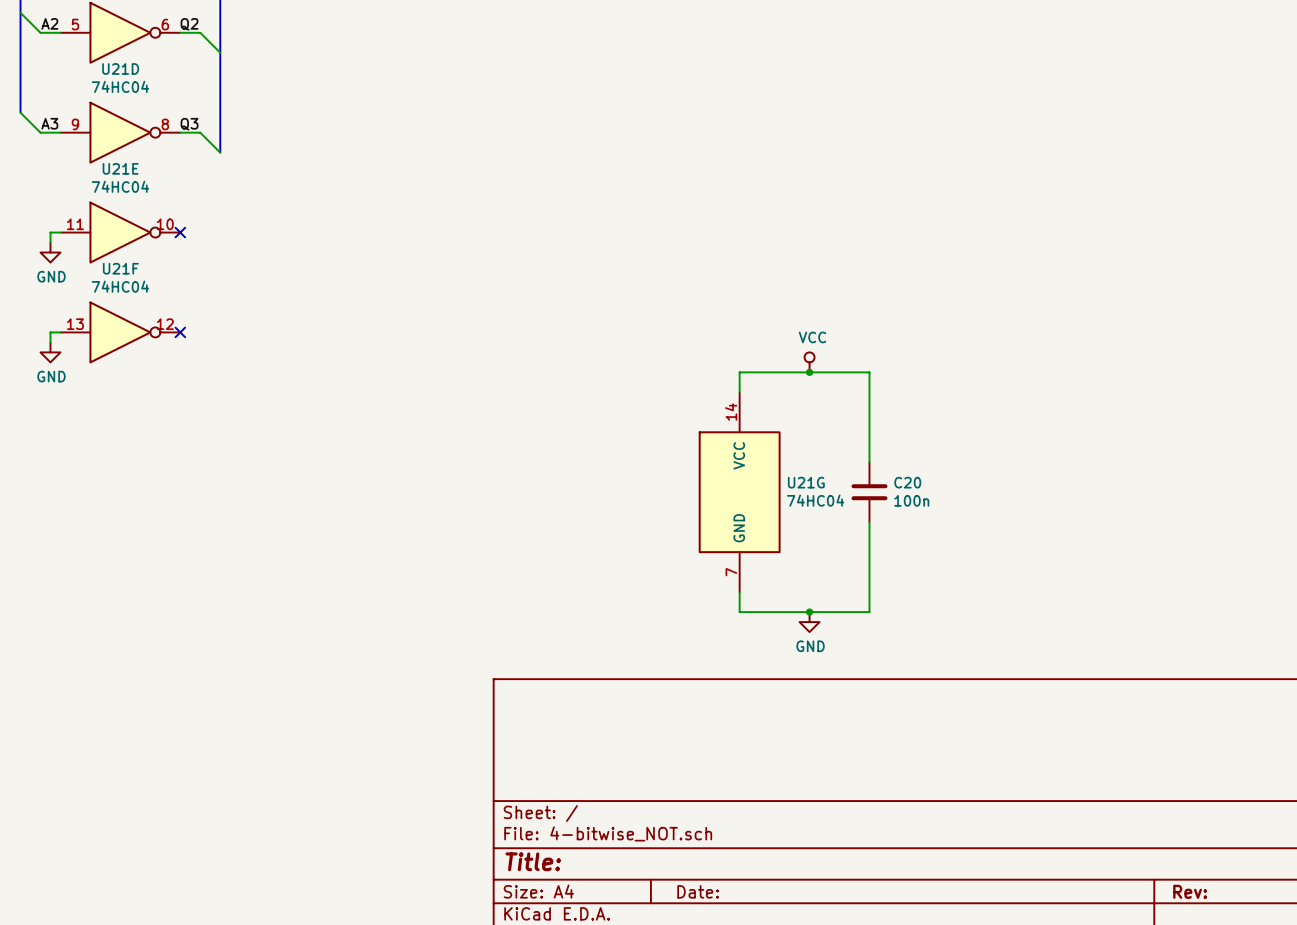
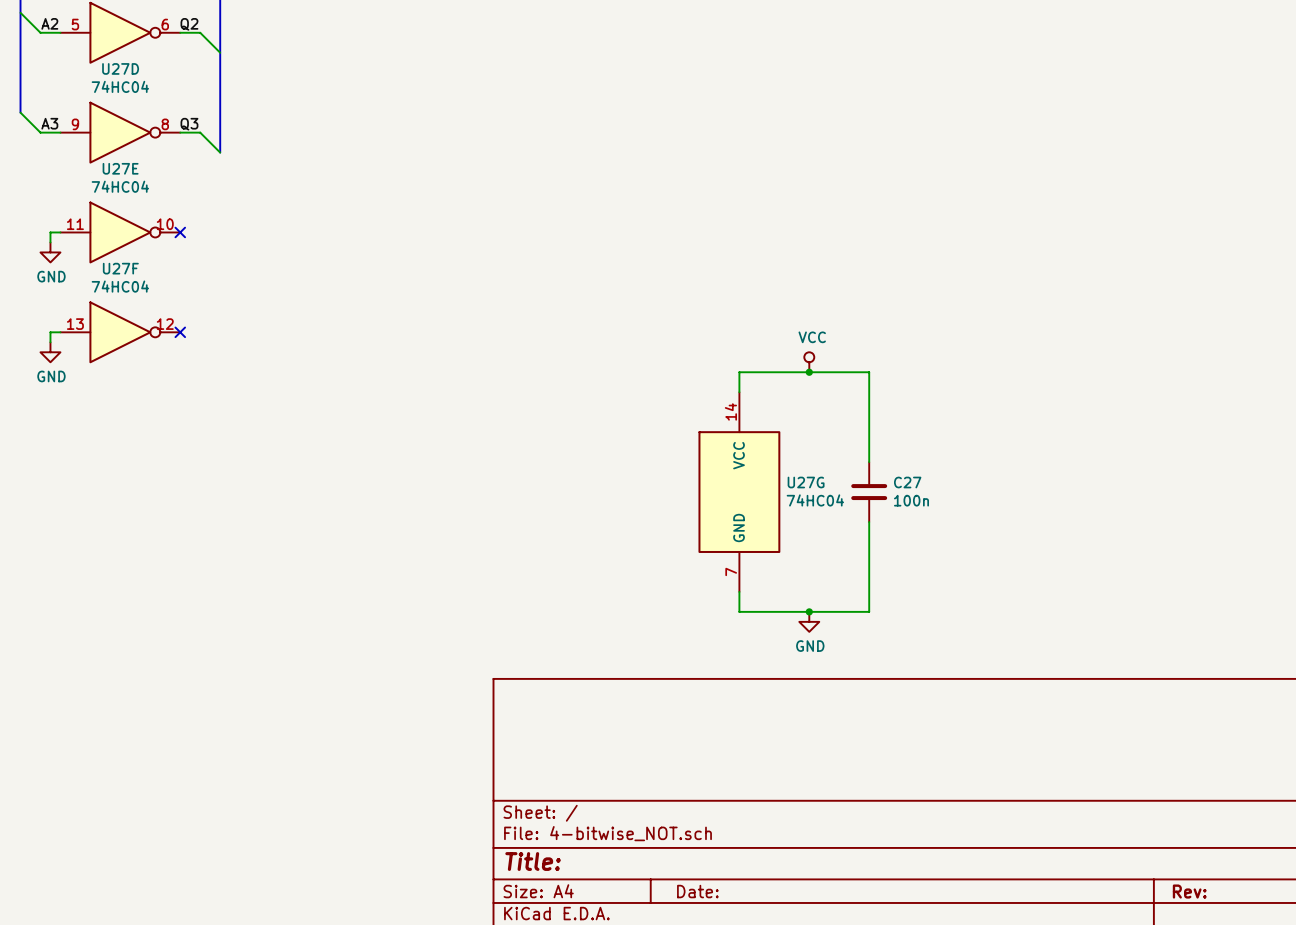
U21D name: U21D (120, 68) -> U27D (120, 68)
U21E name: U21E (120, 168) -> U27E (120, 168)
U21F name: U21F (120, 268) -> U27F (120, 268)
U21G name: U21G (806, 482) -> U27G (806, 482)
C20 name: C20 (907, 482) -> C27 (907, 482)

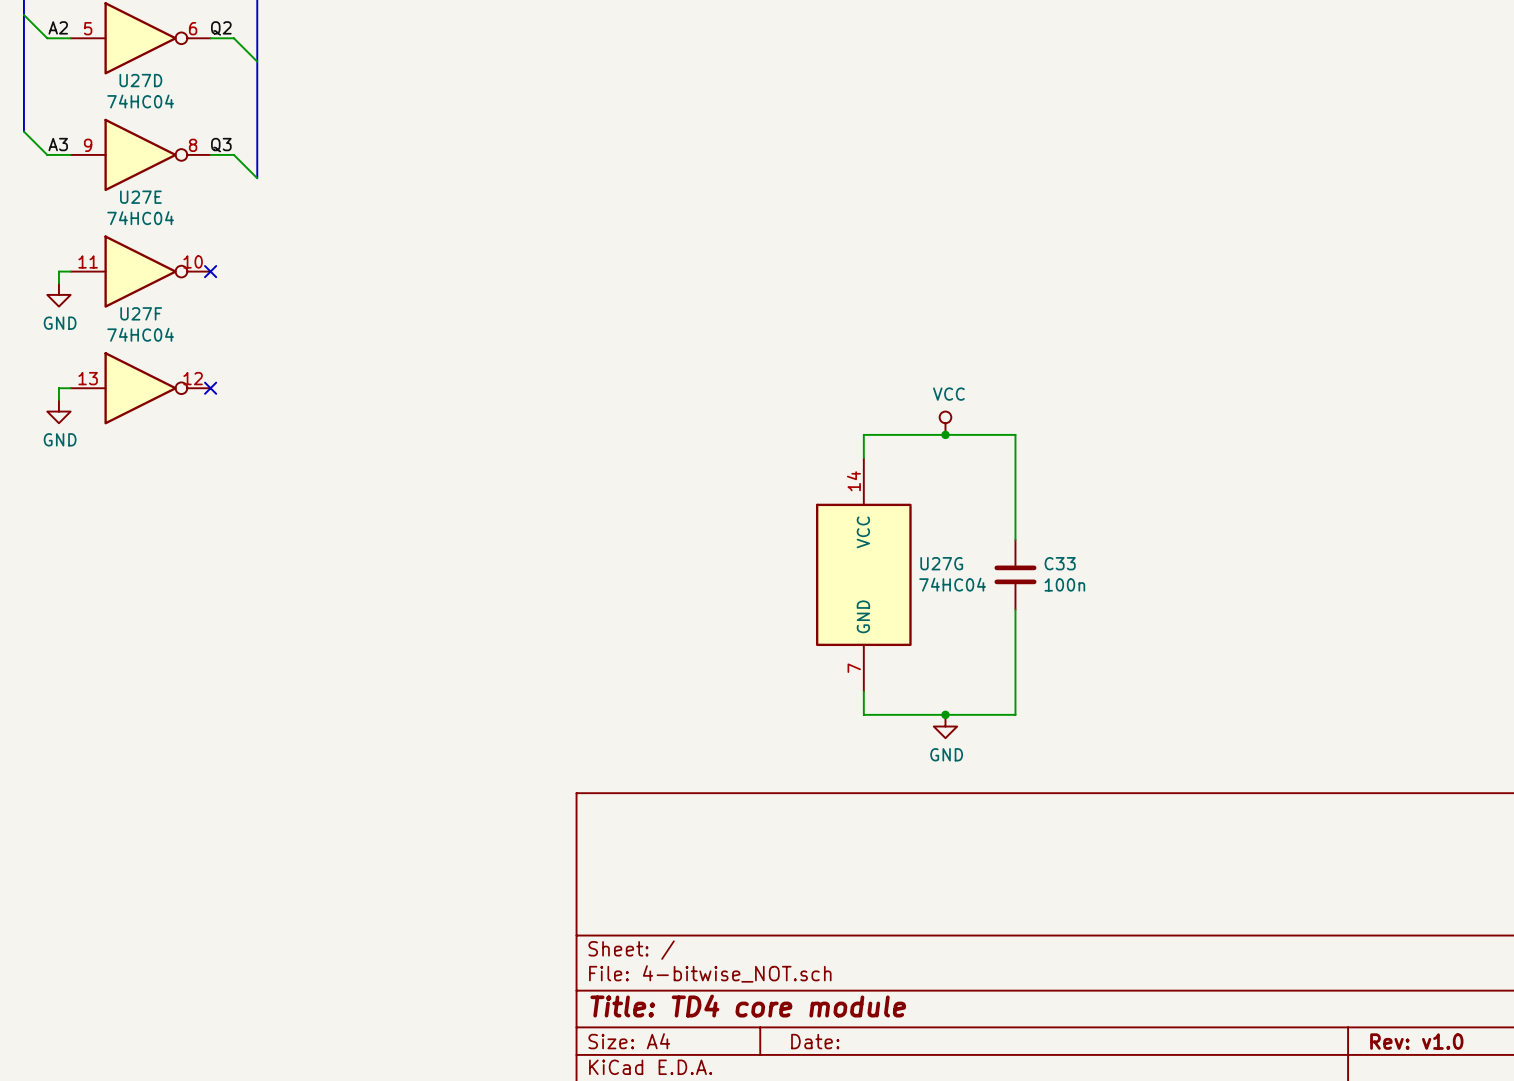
C27 name: C27 (907, 482) -> C33 (1060, 563)
title block: Title: (533, 861) -> Title: TD4 core module (748, 1006)
title block: Rev: (1189, 891) -> Rev: v1.0 (1416, 1041)

